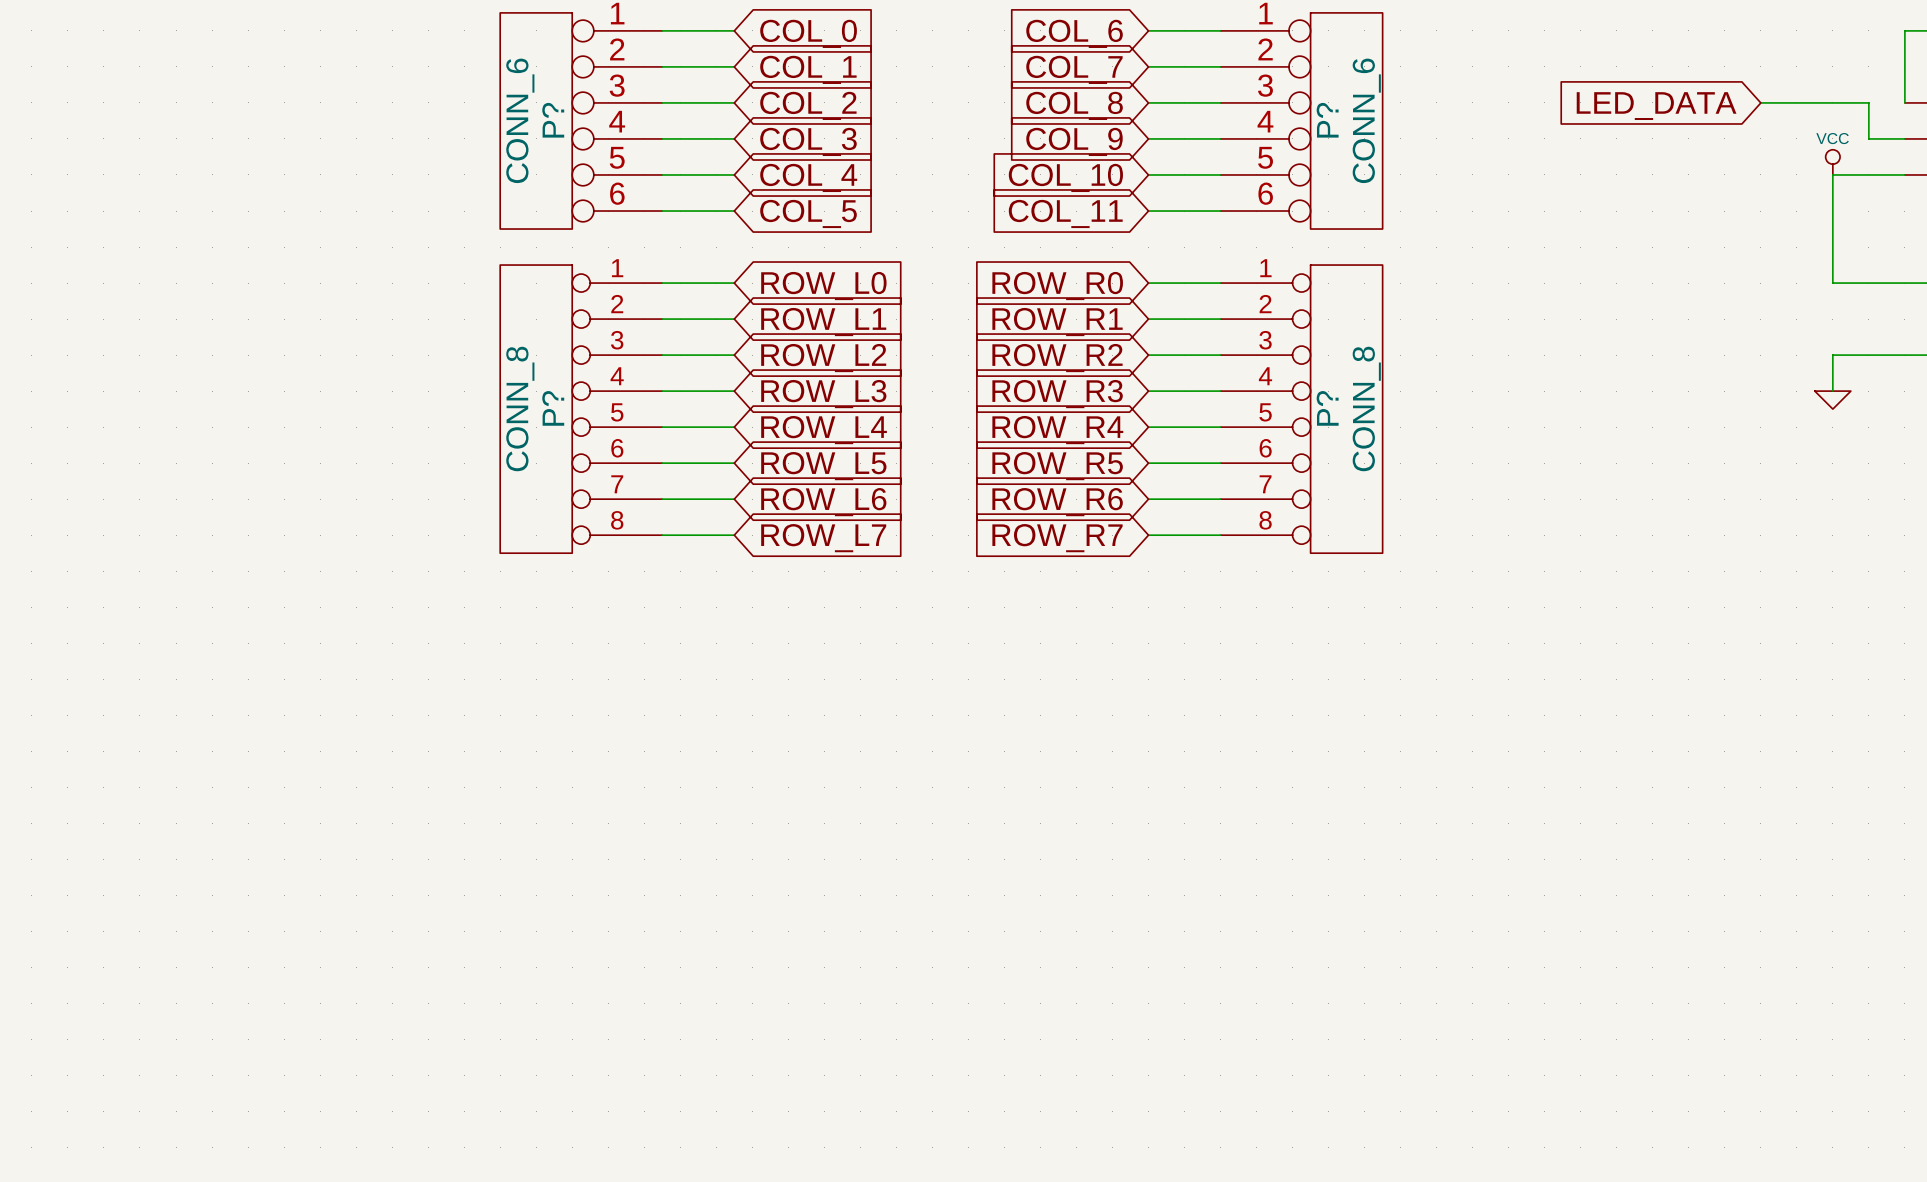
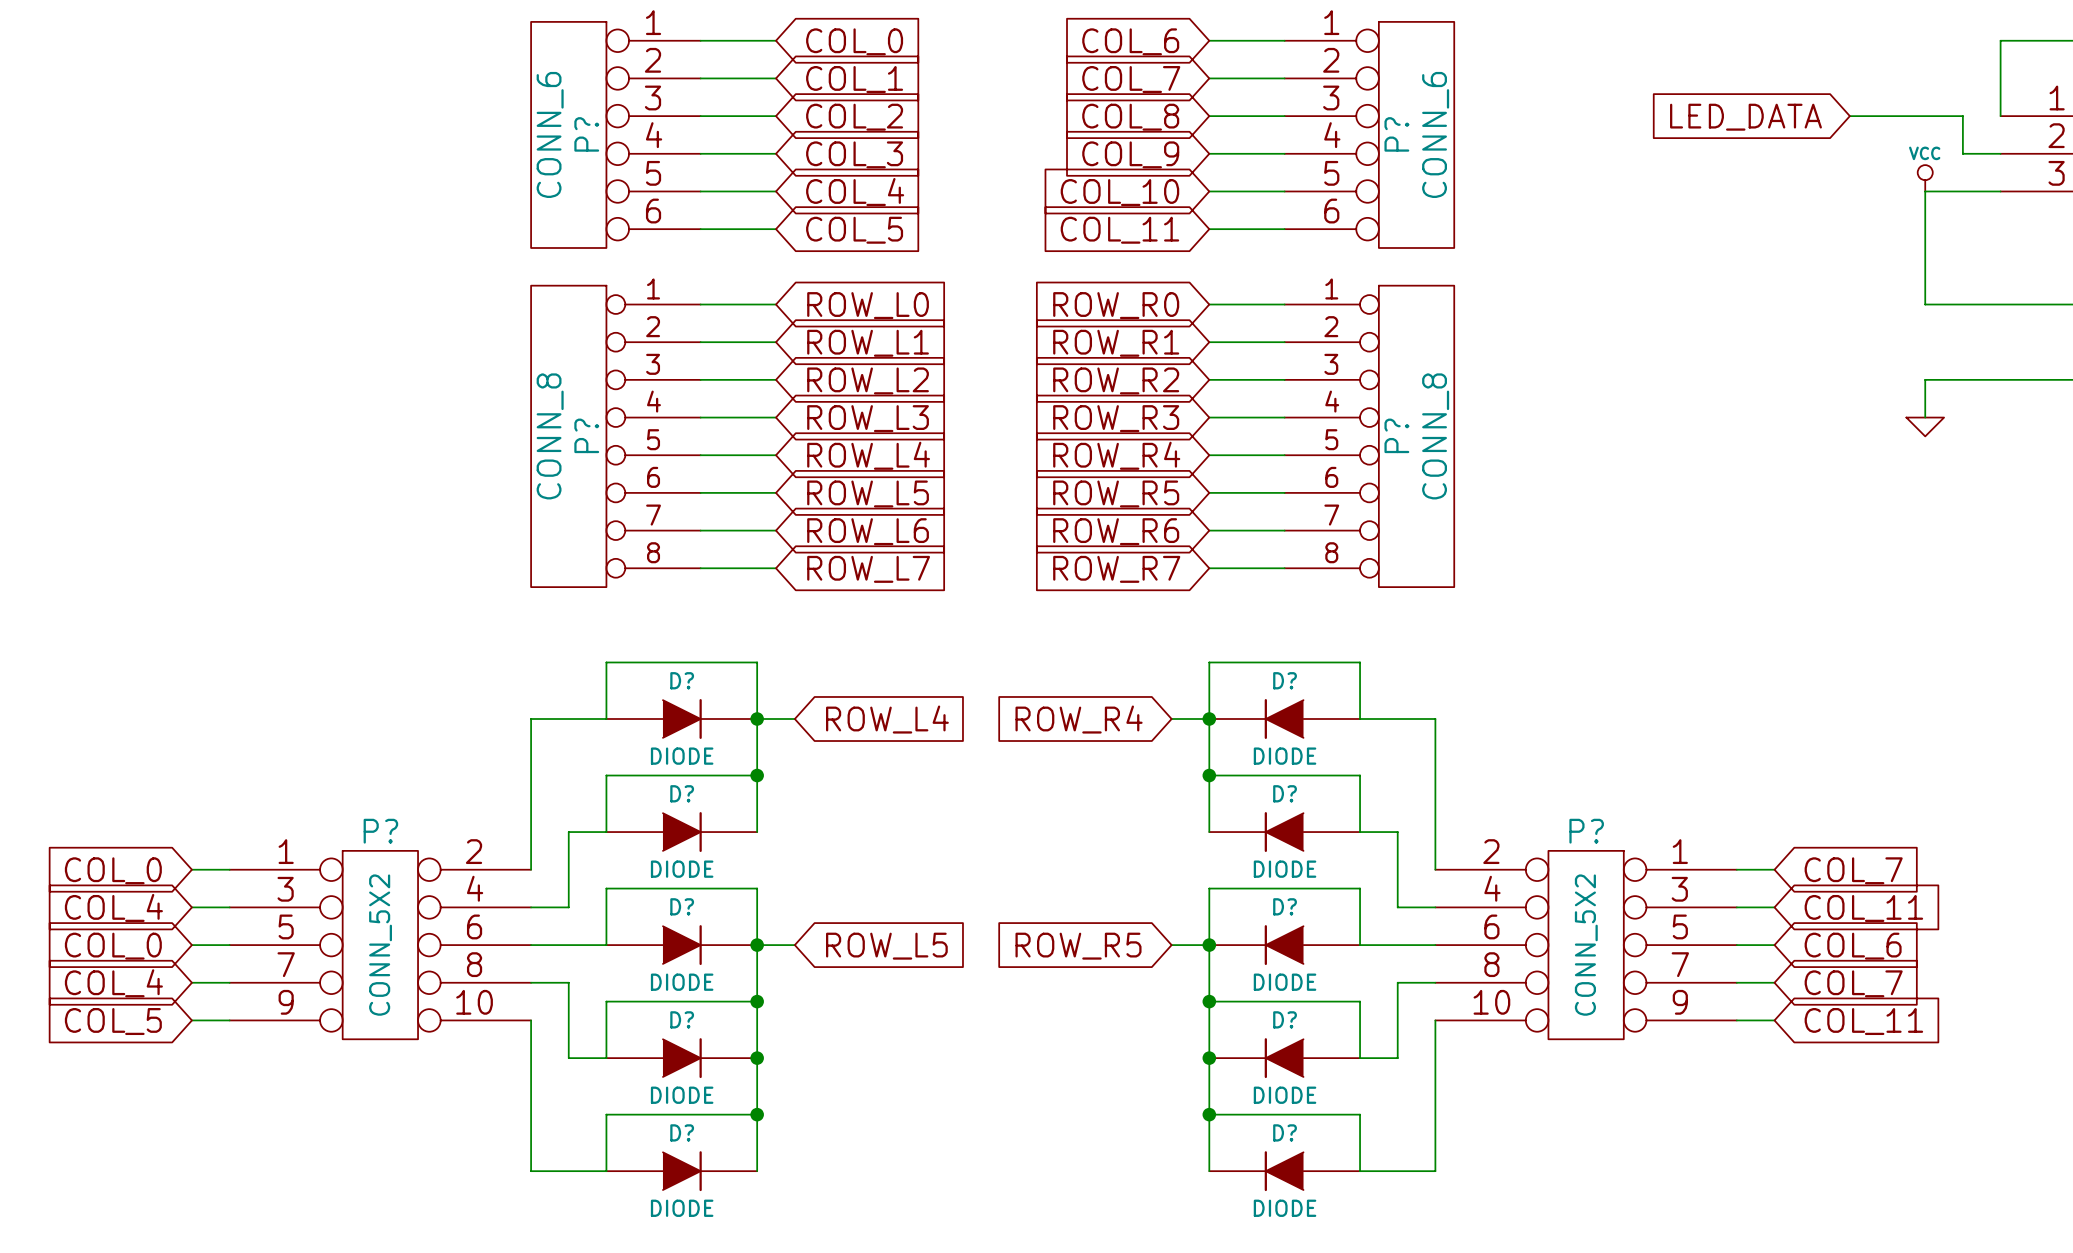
D?: none -> DIODE (681, 719)
wire: none -> (757, 719) (794, 719)
junction: none -> (757, 719)
wire: none -> (1171, 719) (1209, 719)
junction: none -> (1209, 719)
D?: none -> DIODE (1284, 719)
global label: none -> ROW_L4 (887, 719)
global label: none -> ROW_R4 (1079, 719)
wire: none -> (757, 775) (606, 775) (606, 832) (568, 832) (568, 907) (531, 907)
junction: none -> (757, 775)
wire: none -> (1209, 775) (1360, 775) (1360, 832) (1397, 832) (1397, 907) (1435, 907)
junction: none -> (1209, 775)
D?: none -> DIODE (681, 832)
wire: none -> (757, 832) (757, 662) (606, 662) (606, 719) (531, 719) (531, 869)
wire: none -> (1209, 832) (1209, 662) (1360, 662) (1360, 719) (1435, 719) (1435, 869)
D?: none -> DIODE (1284, 832)
wire: none -> (191, 869) (229, 869)
wire: none -> (1736, 869) (1774, 869)
global label: none -> COL_0 (113, 870)
global label: none -> COL_7 (1853, 870)
wire: none -> (191, 907) (229, 907)
wire: none -> (1736, 907) (1774, 907)
global label: none -> COL_4 (113, 907)
global label: none -> COL_11 (1863, 908)
wire: none -> (191, 945) (229, 945)
P?: none -> CONN_5X2 (380, 945)
wire: none -> (531, 945) (606, 945) (606, 888) (757, 888) (757, 1171)
D?: none -> DIODE (681, 945)
wire: none -> (757, 945) (794, 945)
junction: none -> (757, 945)
wire: none -> (1171, 945) (1209, 945)
junction: none -> (1209, 945)
D?: none -> DIODE (1284, 945)
wire: none -> (1435, 945) (1360, 945) (1360, 888) (1209, 888) (1209, 1171)
P?: none -> CONN_5X2 (1586, 945)
wire: none -> (1736, 945) (1774, 945)
global label: none -> COL_0 (113, 946)
global label: none -> ROW_L5 (886, 946)
global label: none -> ROW_R5 (1078, 946)
global label: none -> COL_6 (1853, 946)
wire: none -> (191, 982) (229, 982)
wire: none -> (531, 982) (568, 982) (568, 1058) (606, 1058) (606, 1001) (757, 1001)
wire: none -> (1435, 982) (1397, 982) (1397, 1058) (1360, 1058) (1360, 1001) (1209, 1001)
wire: none -> (1736, 982) (1774, 982)
global label: none -> COL_4 (113, 983)
global label: none -> COL_7 (1853, 983)
junction: none -> (757, 1001)
junction: none -> (1209, 1001)
wire: none -> (191, 1020) (229, 1020)
wire: none -> (531, 1020) (531, 1171) (606, 1171) (606, 1114) (757, 1114)
wire: none -> (1435, 1020) (1435, 1171) (1360, 1171) (1360, 1114) (1209, 1114)
wire: none -> (1736, 1020) (1774, 1020)
global label: none -> COL_5 (113, 1021)
global label: none -> COL_11 (1863, 1021)
D?: none -> DIODE (681, 1058)
junction: none -> (757, 1058)
junction: none -> (1209, 1058)
D?: none -> DIODE (1284, 1058)
junction: none -> (757, 1114)
junction: none -> (1209, 1114)
D?: none -> DIODE (681, 1171)
D?: none -> DIODE (1284, 1171)

